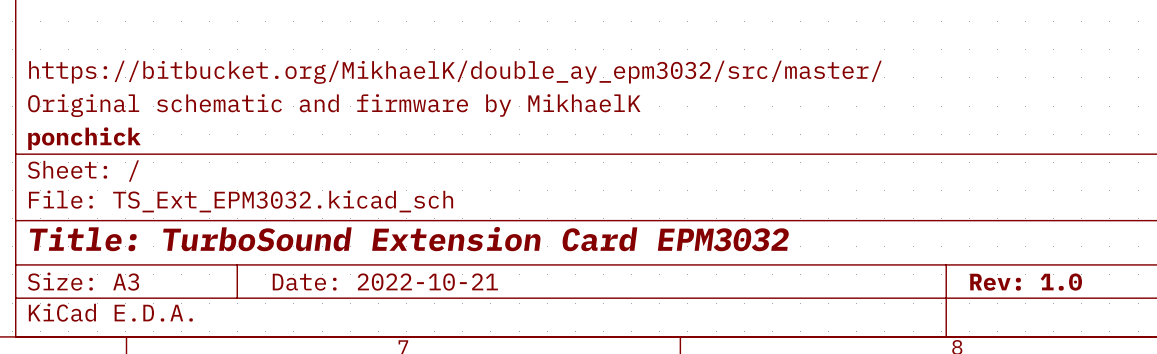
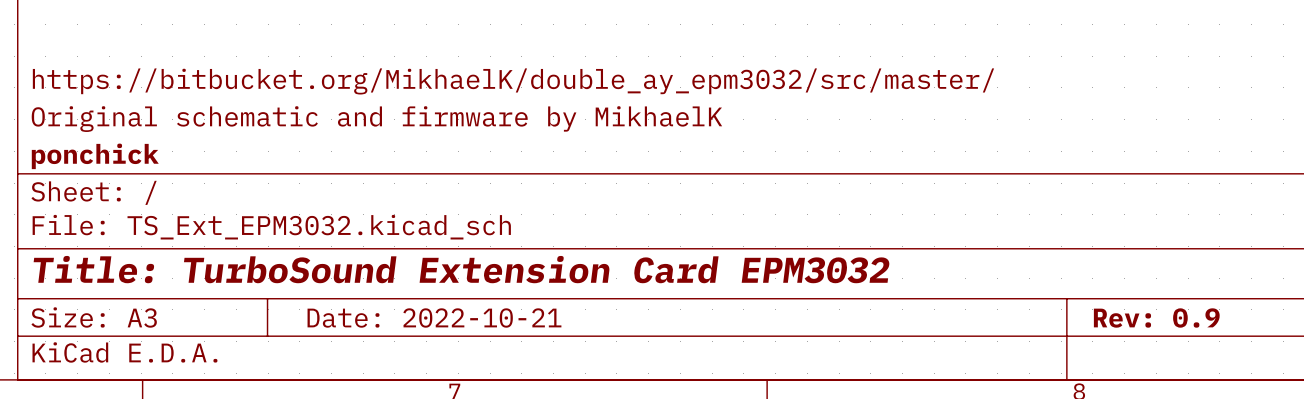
title block: Rev: 1.0 (1026, 282) -> Rev: 0.9 (1156, 318)

